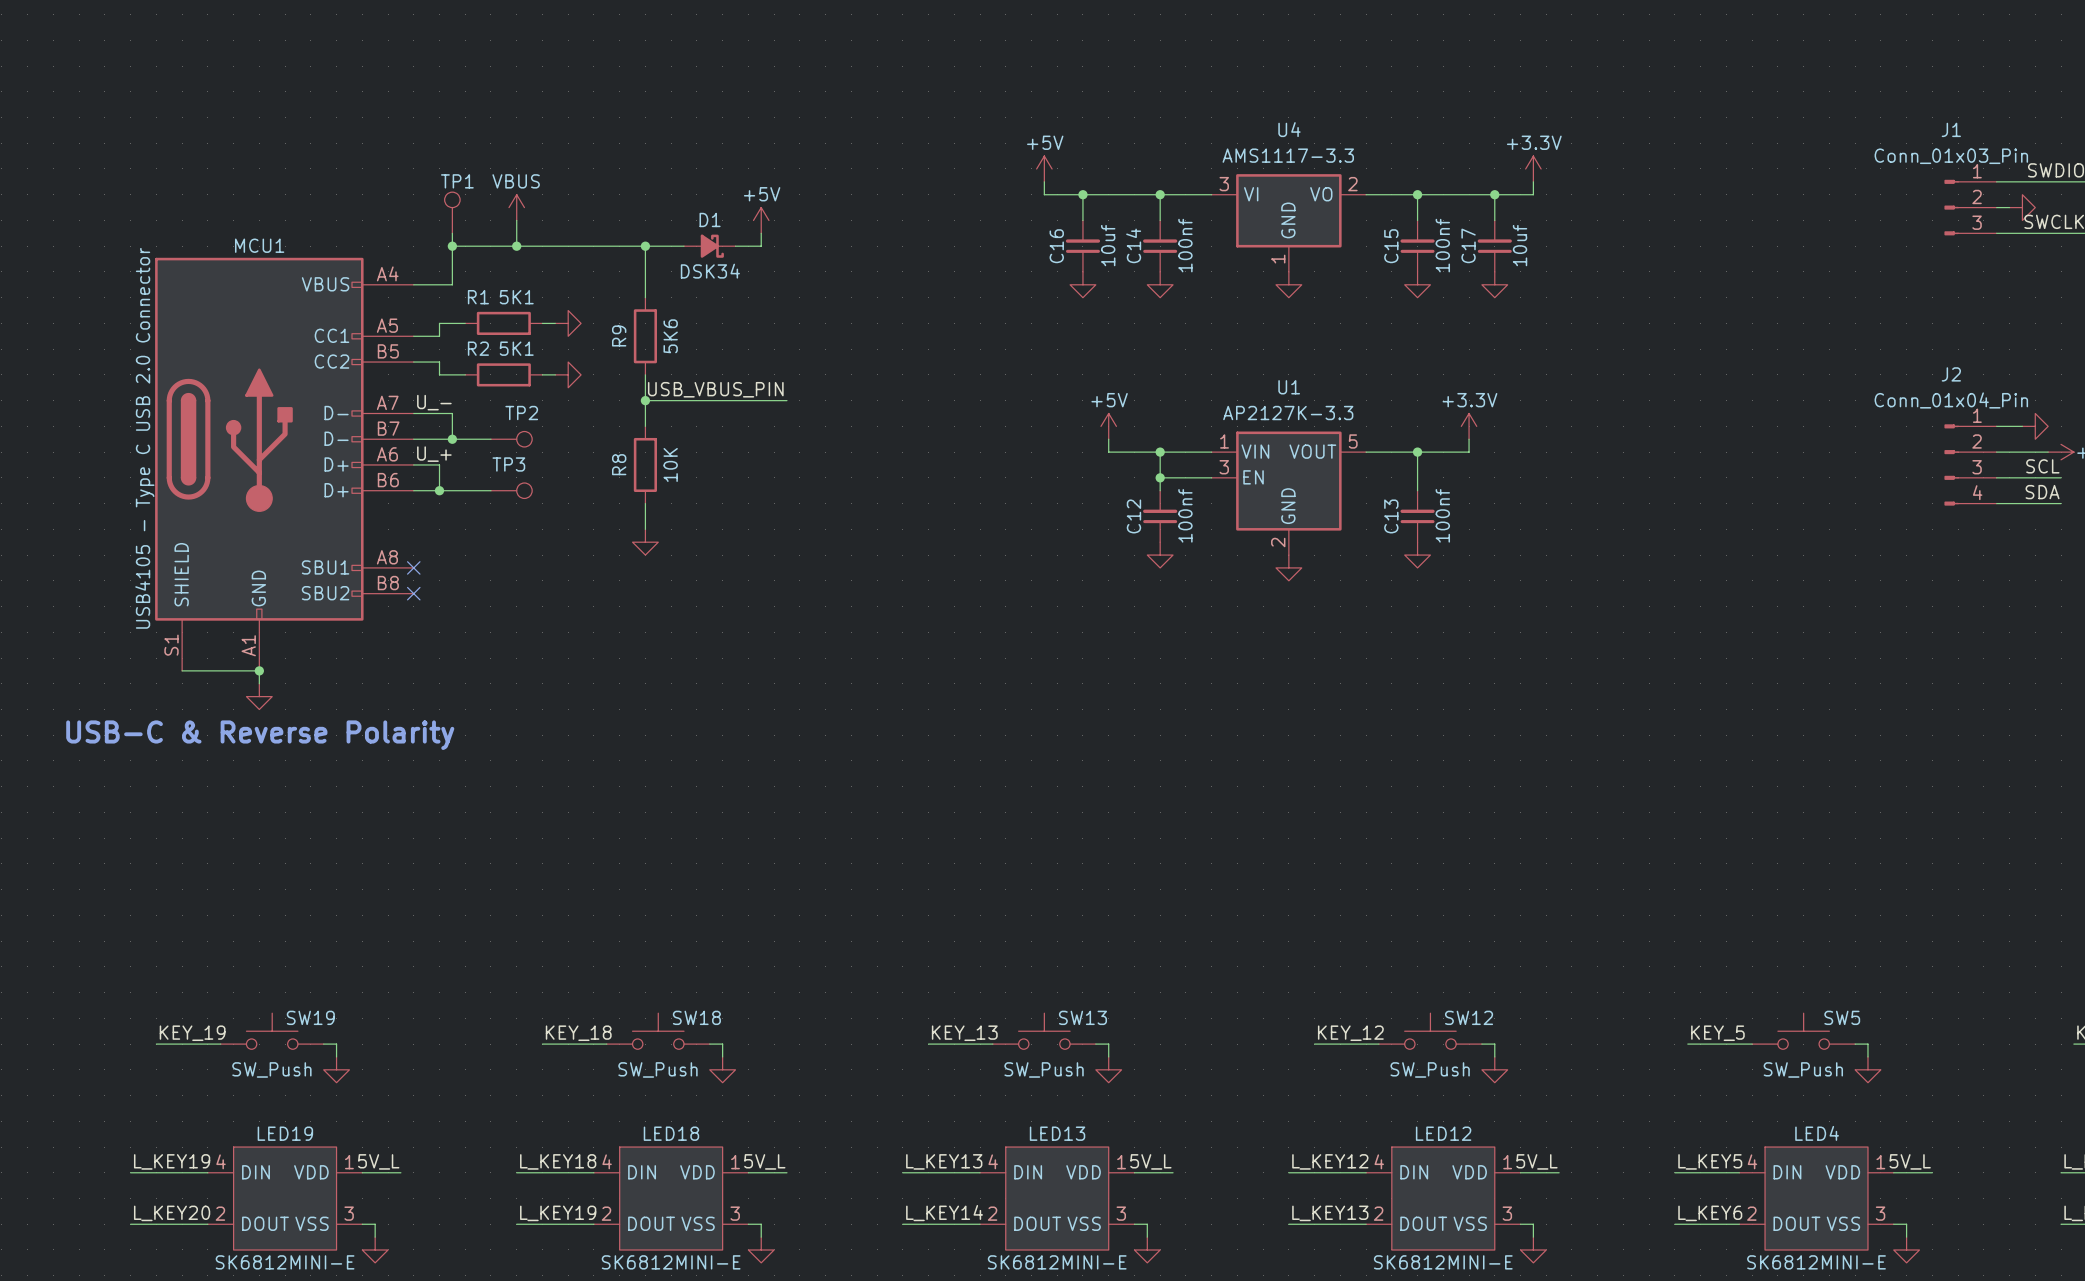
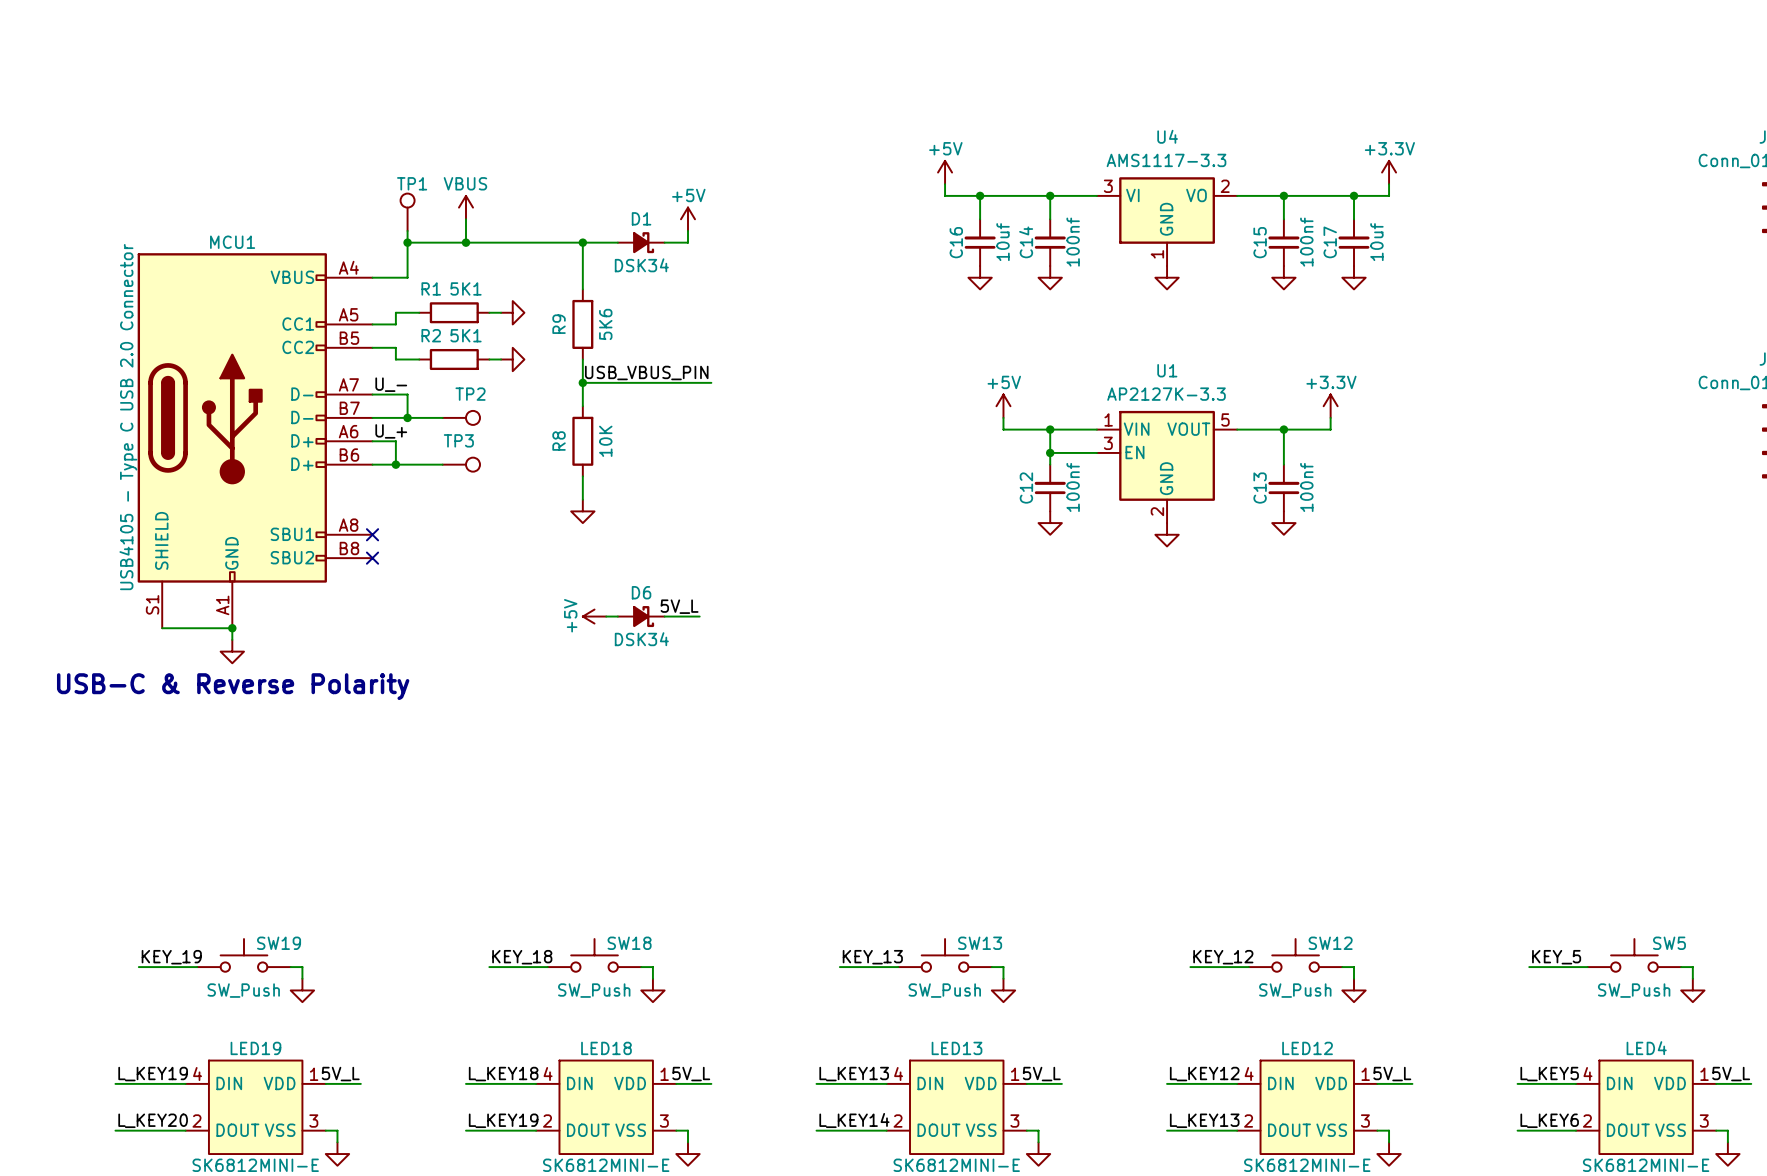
label: none -> 5V_L (679, 606)
power symbol: none -> +5V (594, 616)
wire: none -> (606, 616) (617, 616)
D6: none -> DSK34 (641, 616)
wire: none -> (664, 616) (699, 616)

